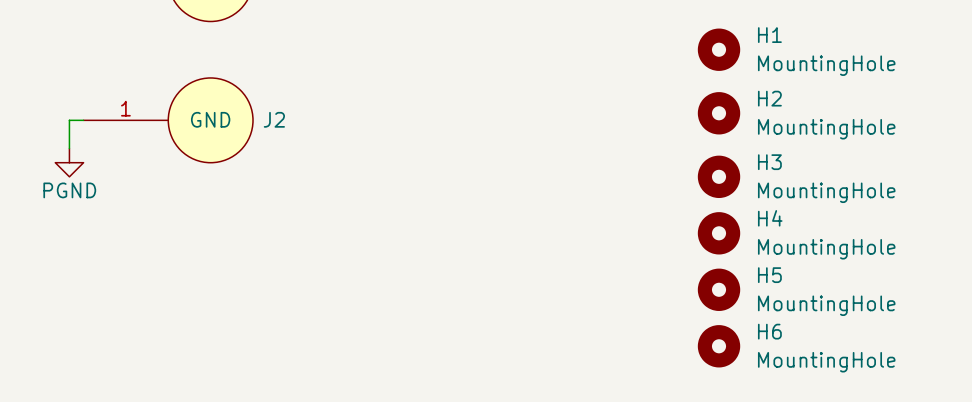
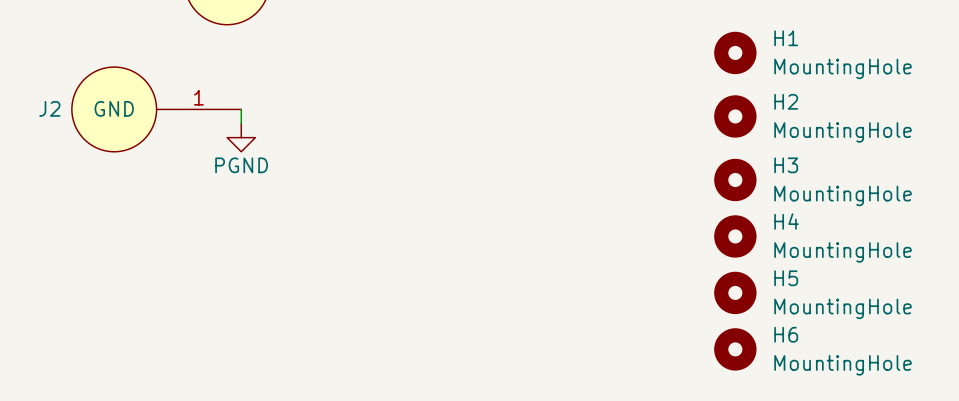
J2 rotation: 0° (210, 120) -> 180° (114, 109)
power symbol position: PGND (69, 162) -> PGND (241, 137)

